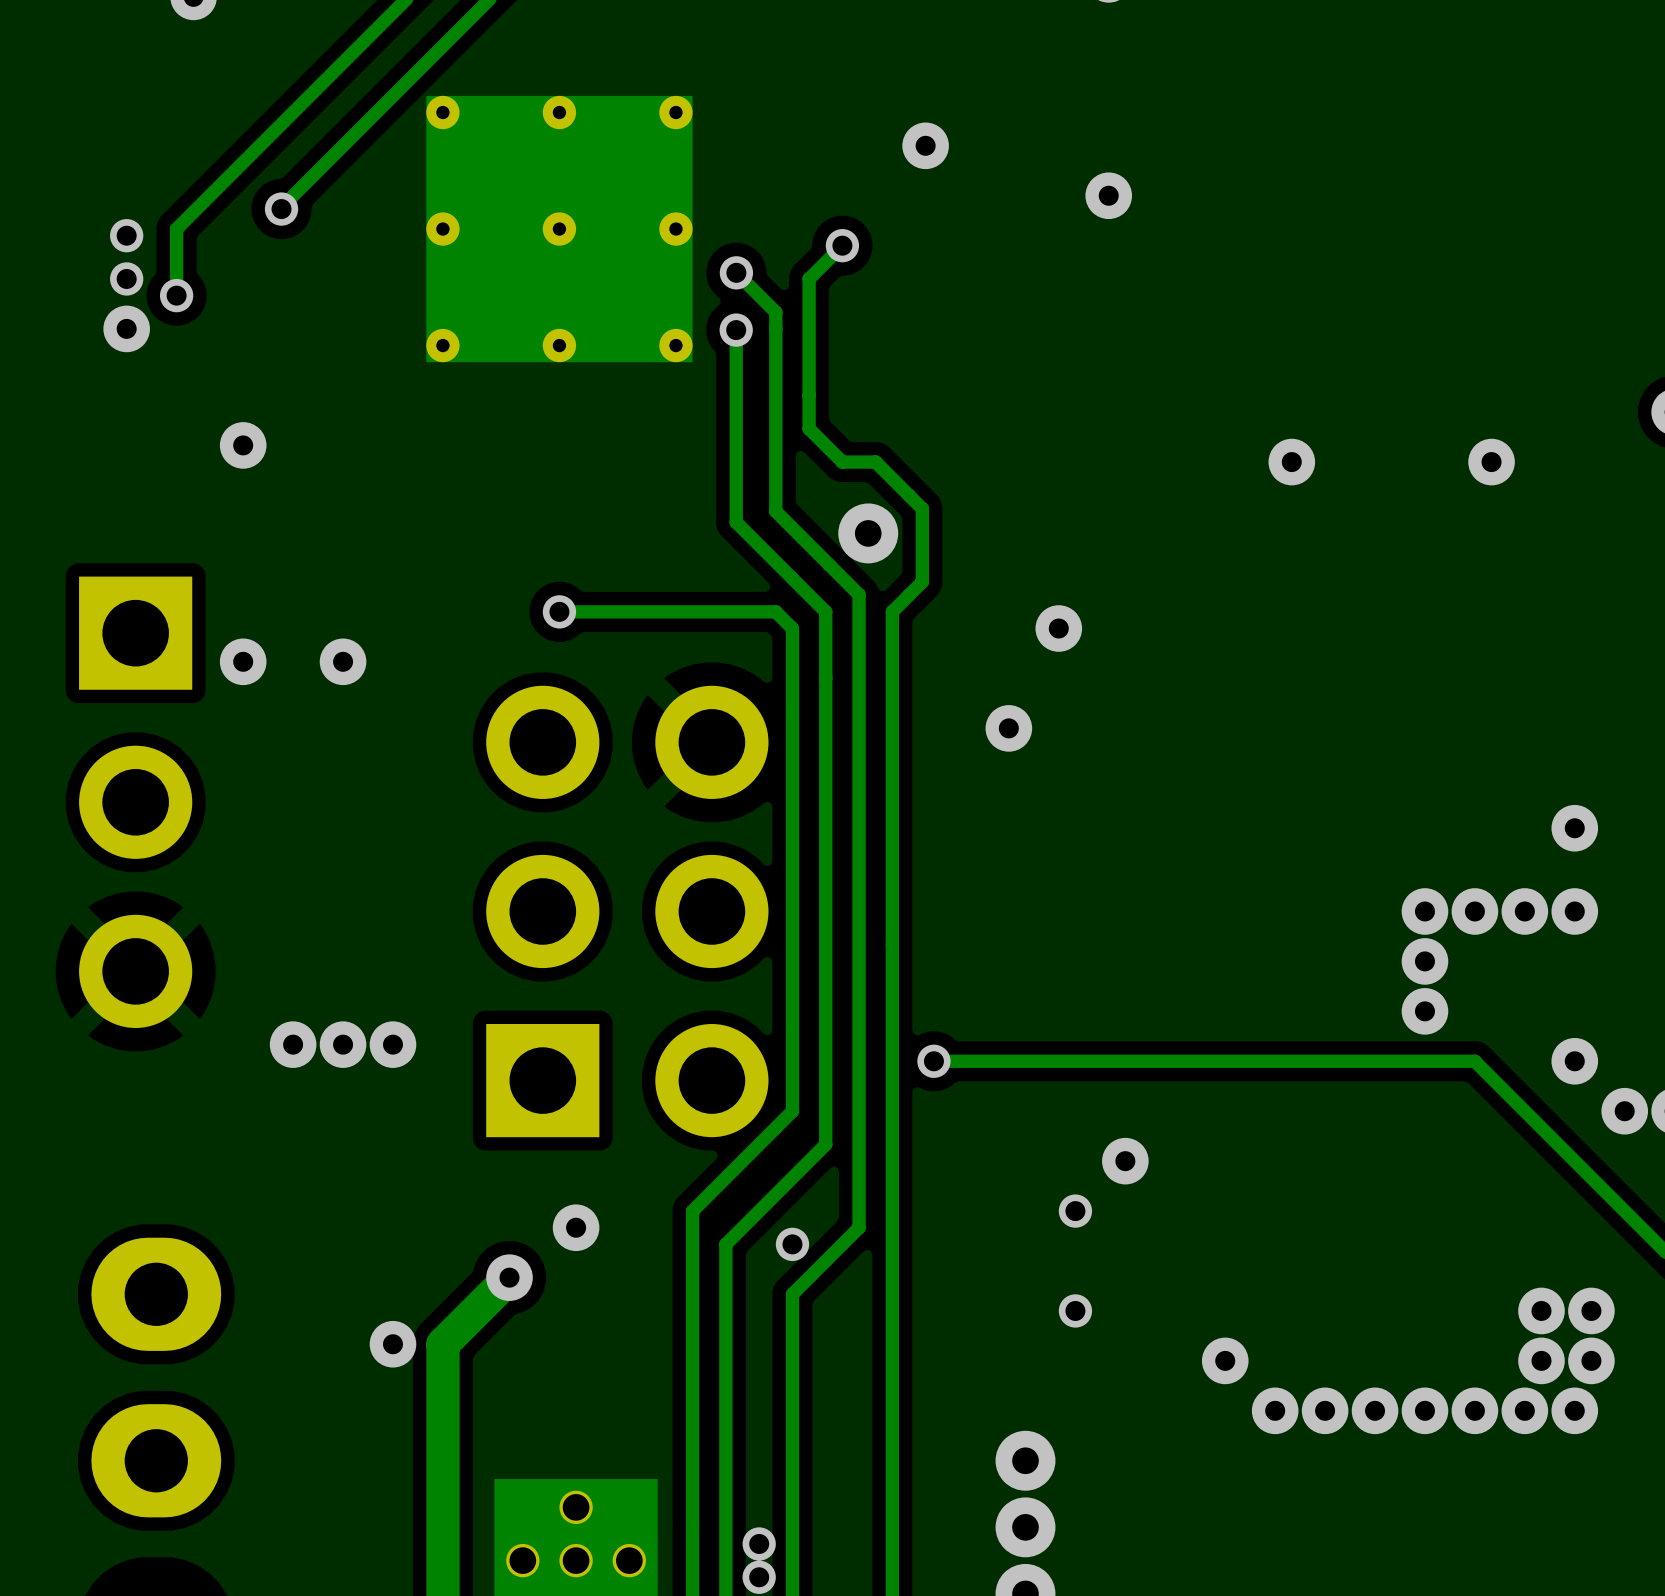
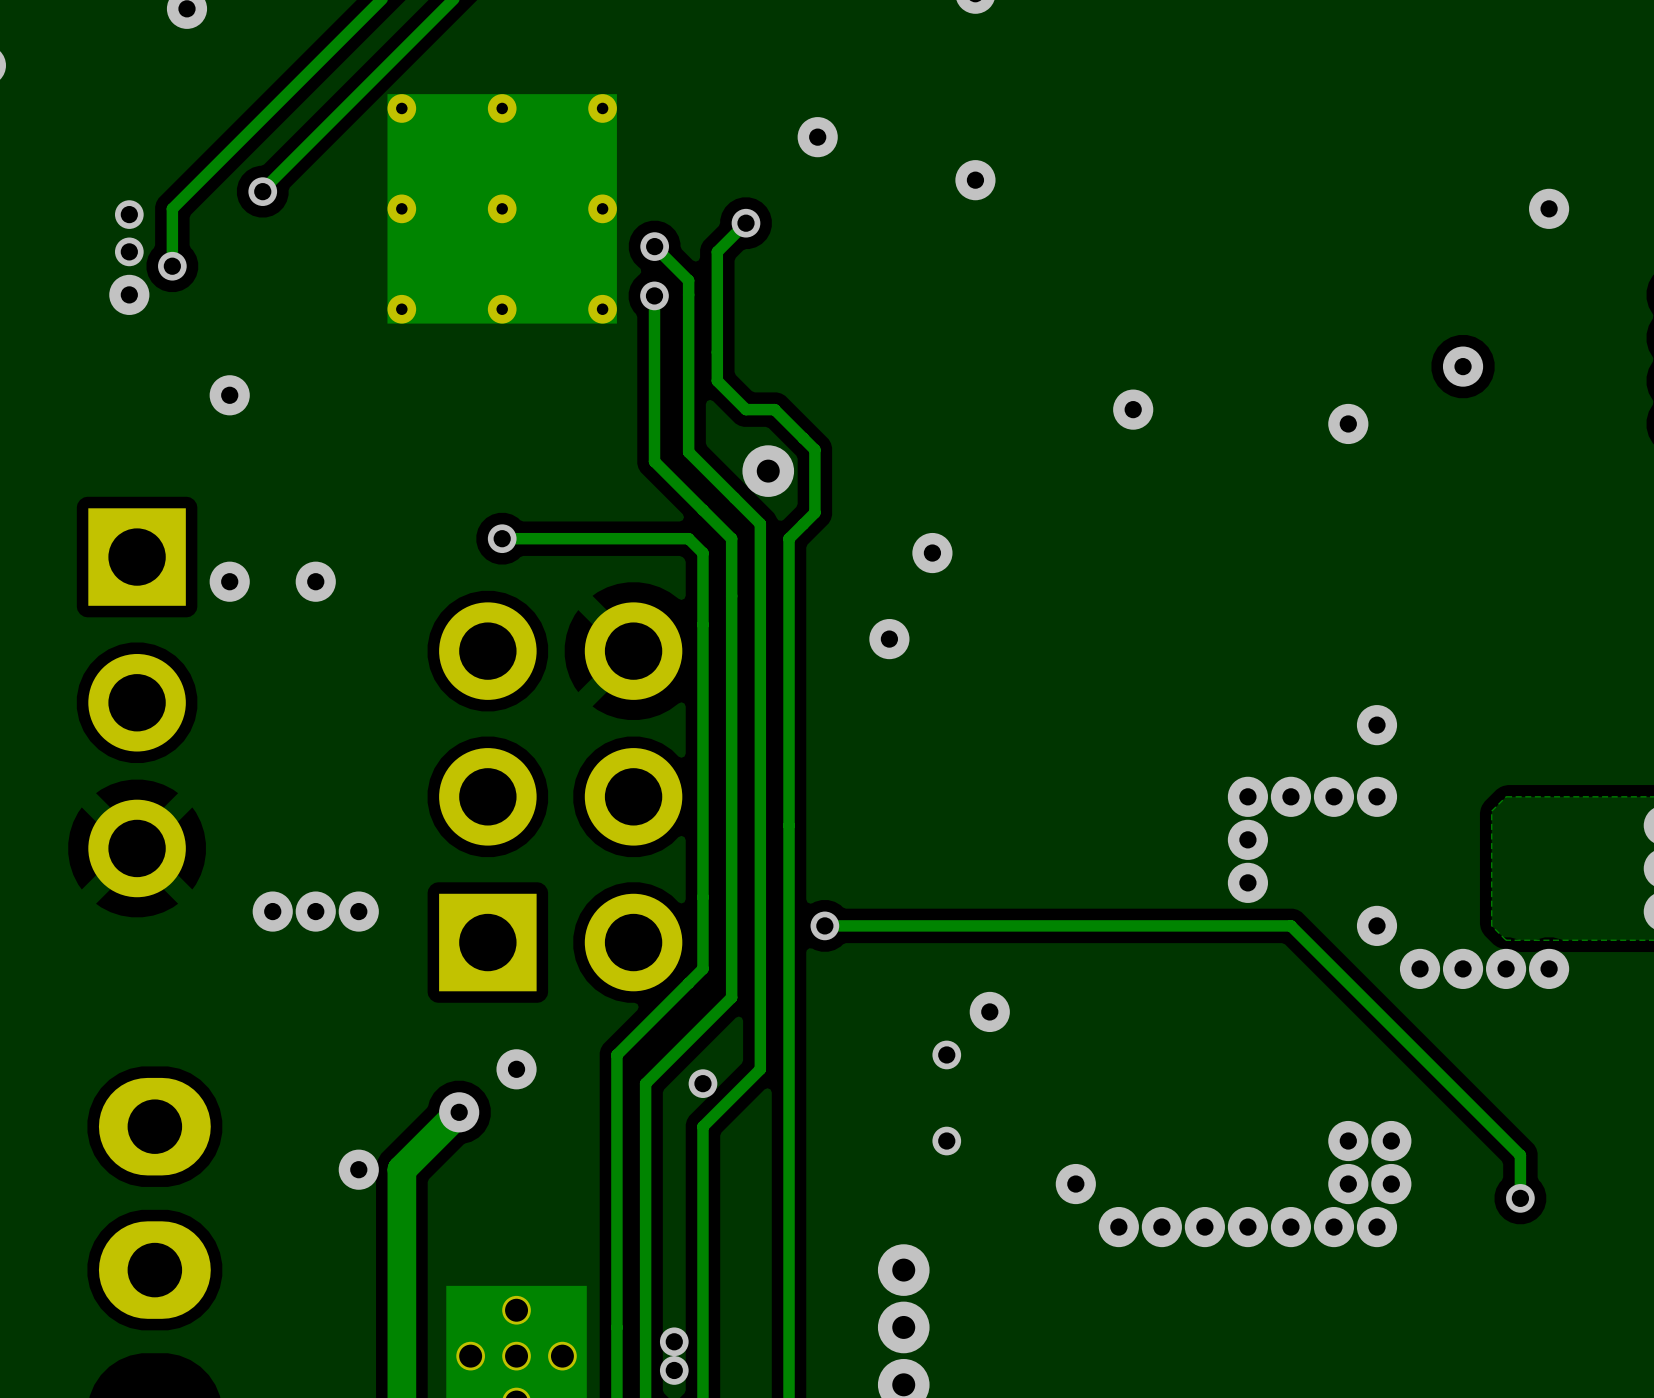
via position: (1491, 462) -> (1348, 423)

